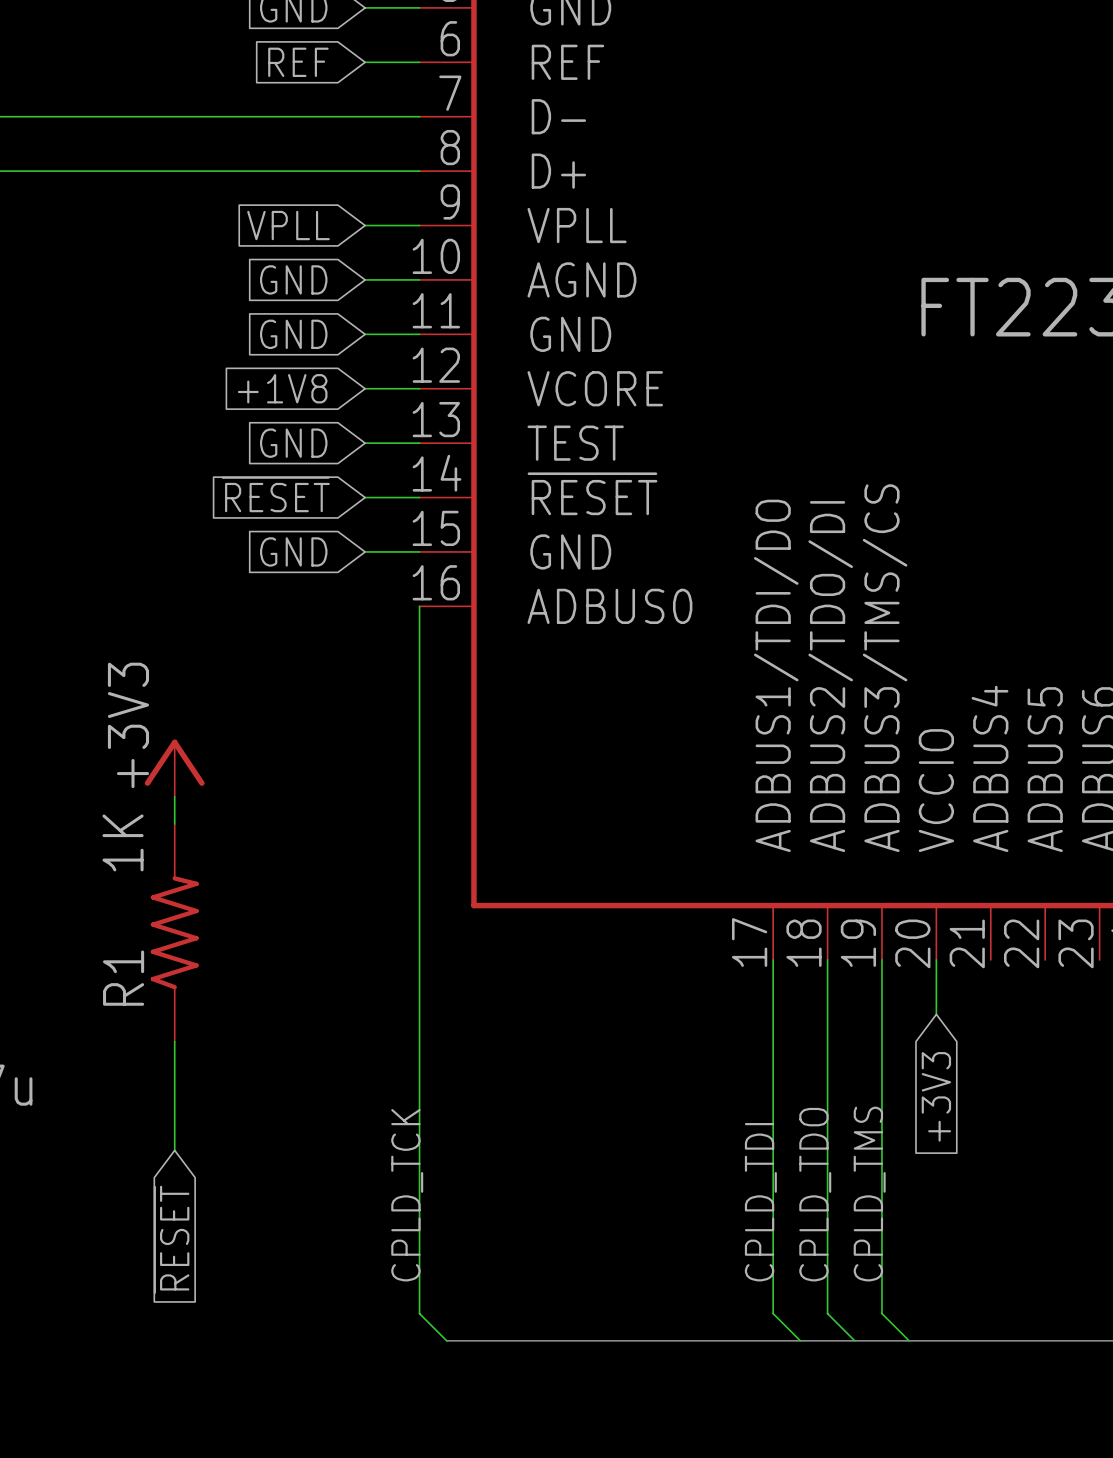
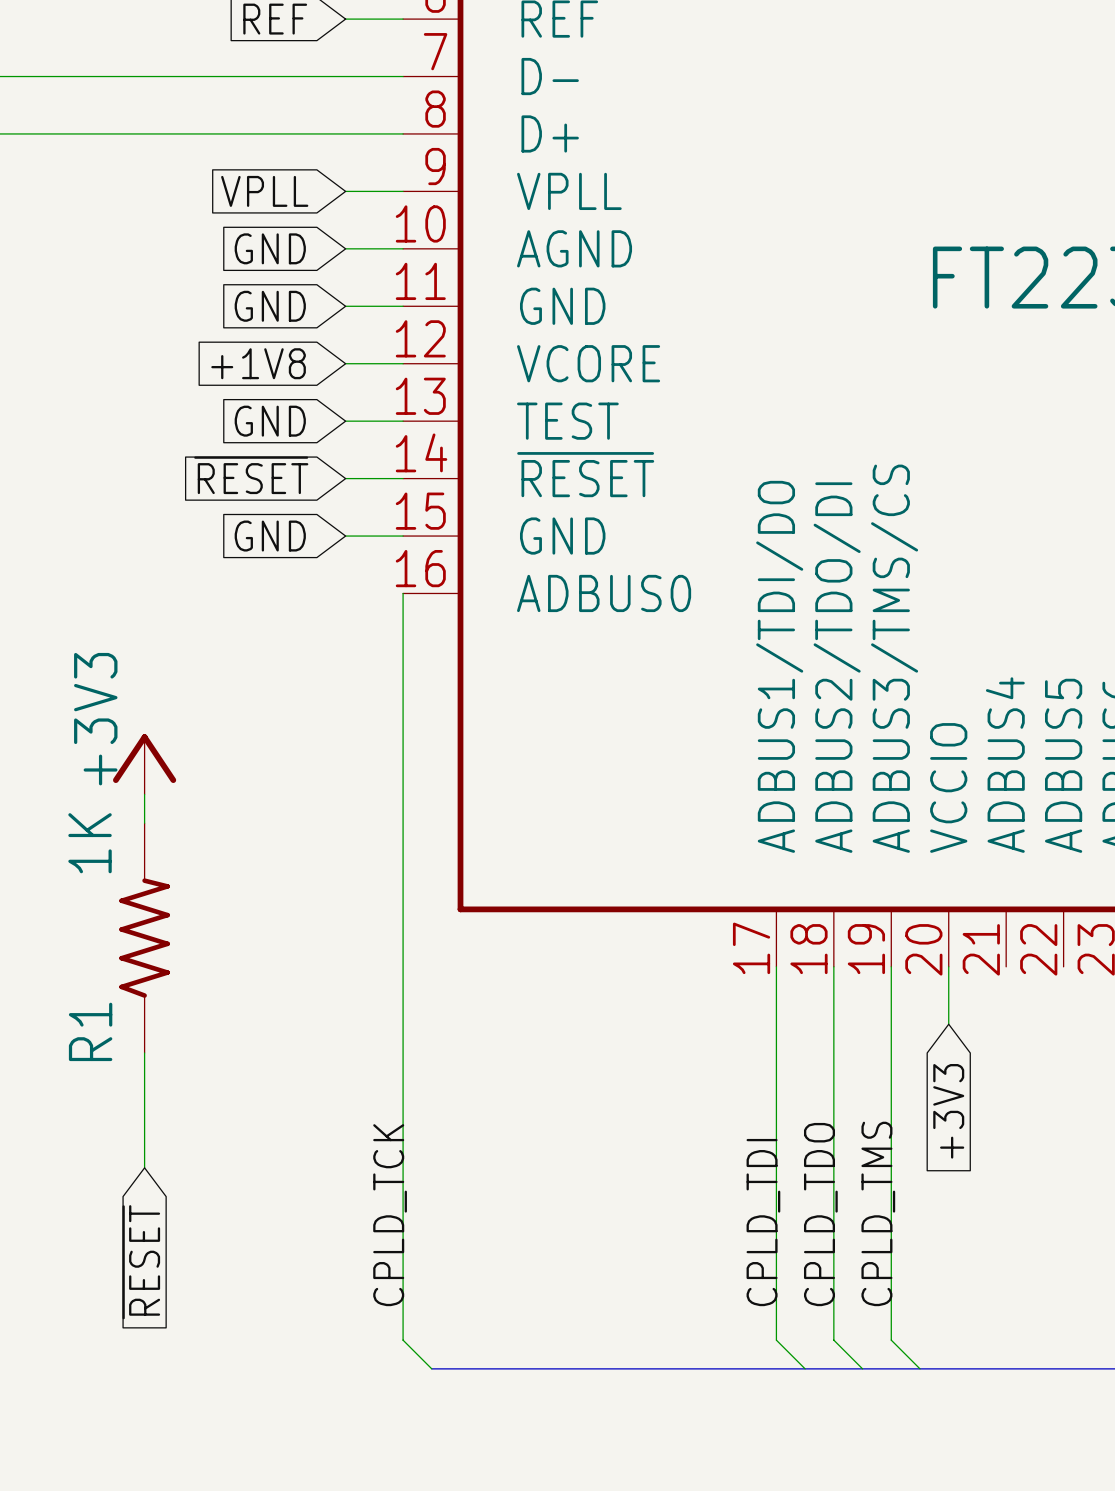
R1 name position: R1 (123, 978) -> R1 (90, 1031)

